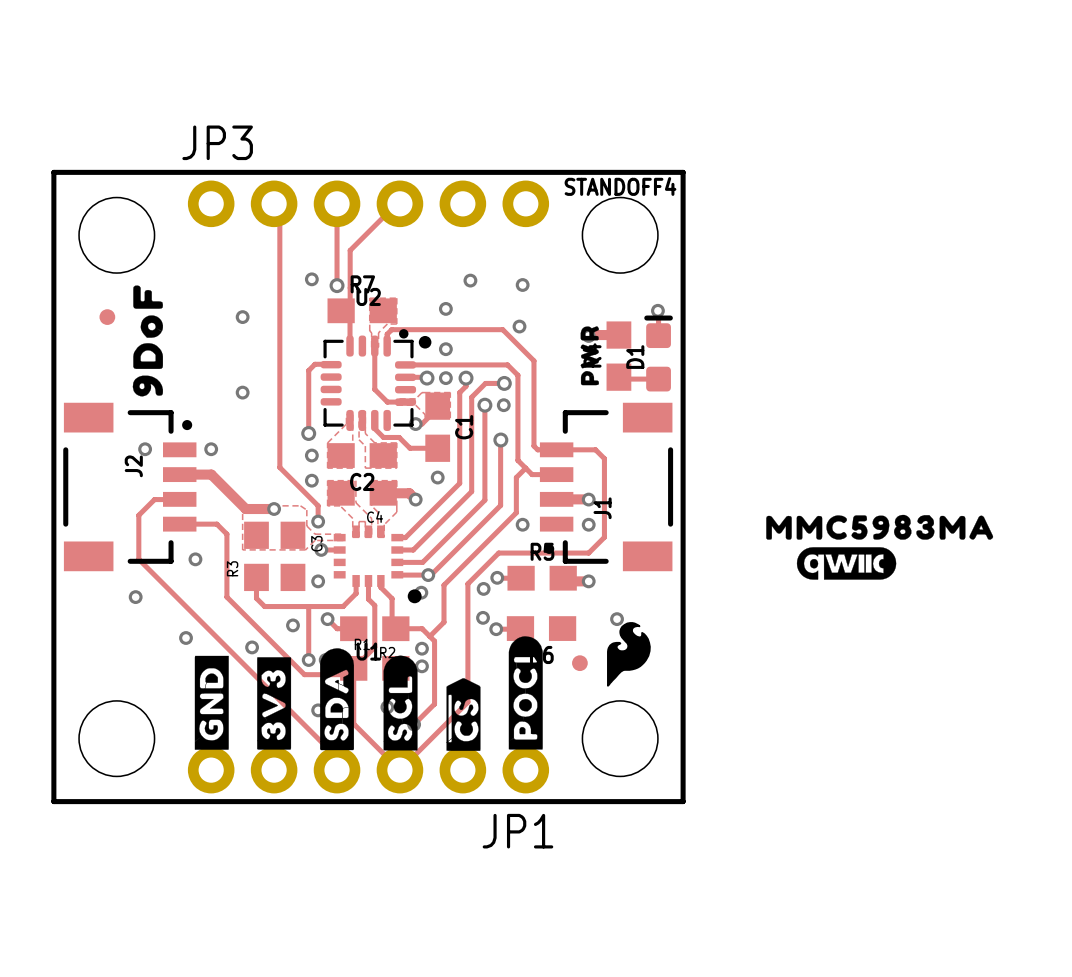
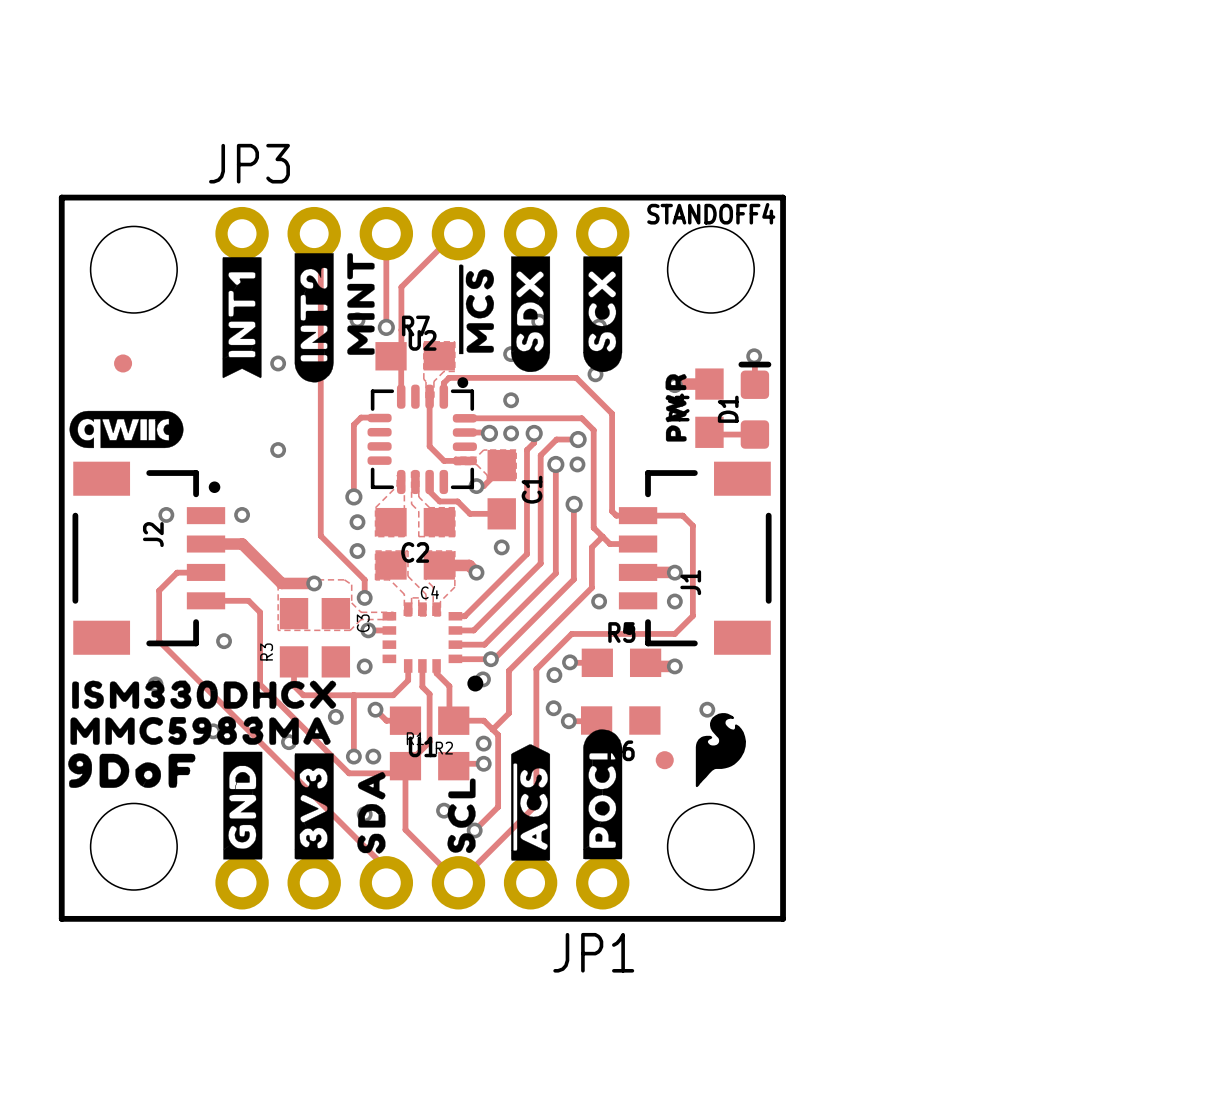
drawing: none -> [222, 253, 375, 383]
drawing: none -> [459, 256, 623, 373]
drawing: [132, 285, 164, 397] -> none
drawing: [418, 335, 432, 349] -> none
drawing: none -> [69, 410, 184, 449]
drawing: [766, 514, 994, 580] -> none
drawing: none -> [68, 680, 337, 788]
drawing shape: [320, 648, 354, 751] -> [357, 771, 386, 854]
drawing shape: [383, 655, 418, 751] -> [447, 778, 476, 854]
drawing shape: [446, 678, 481, 751] -> [511, 744, 551, 861]

